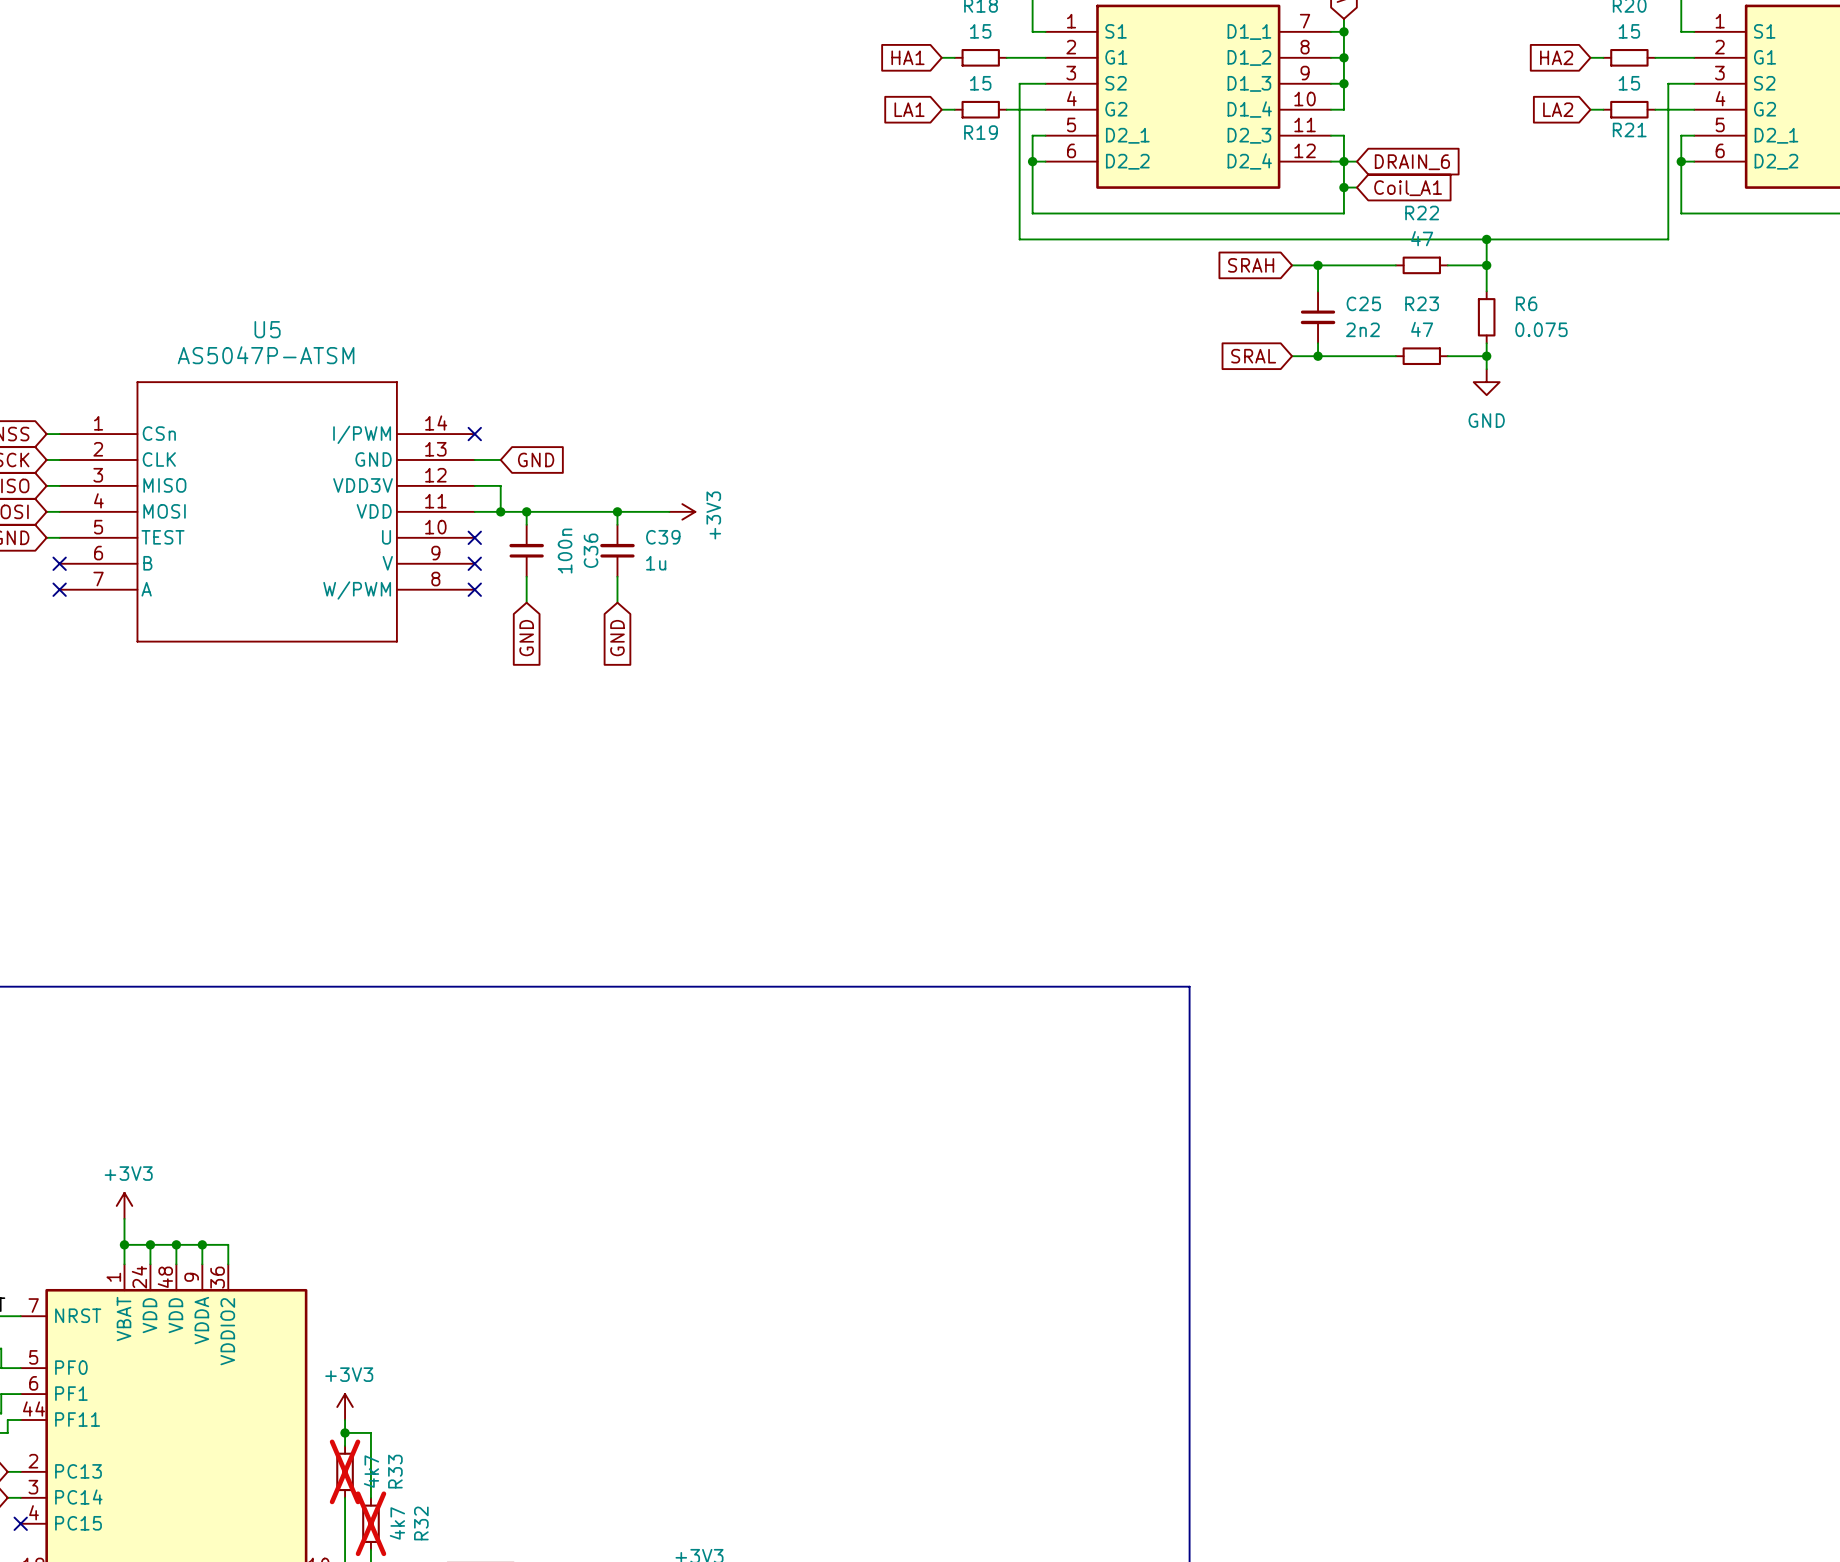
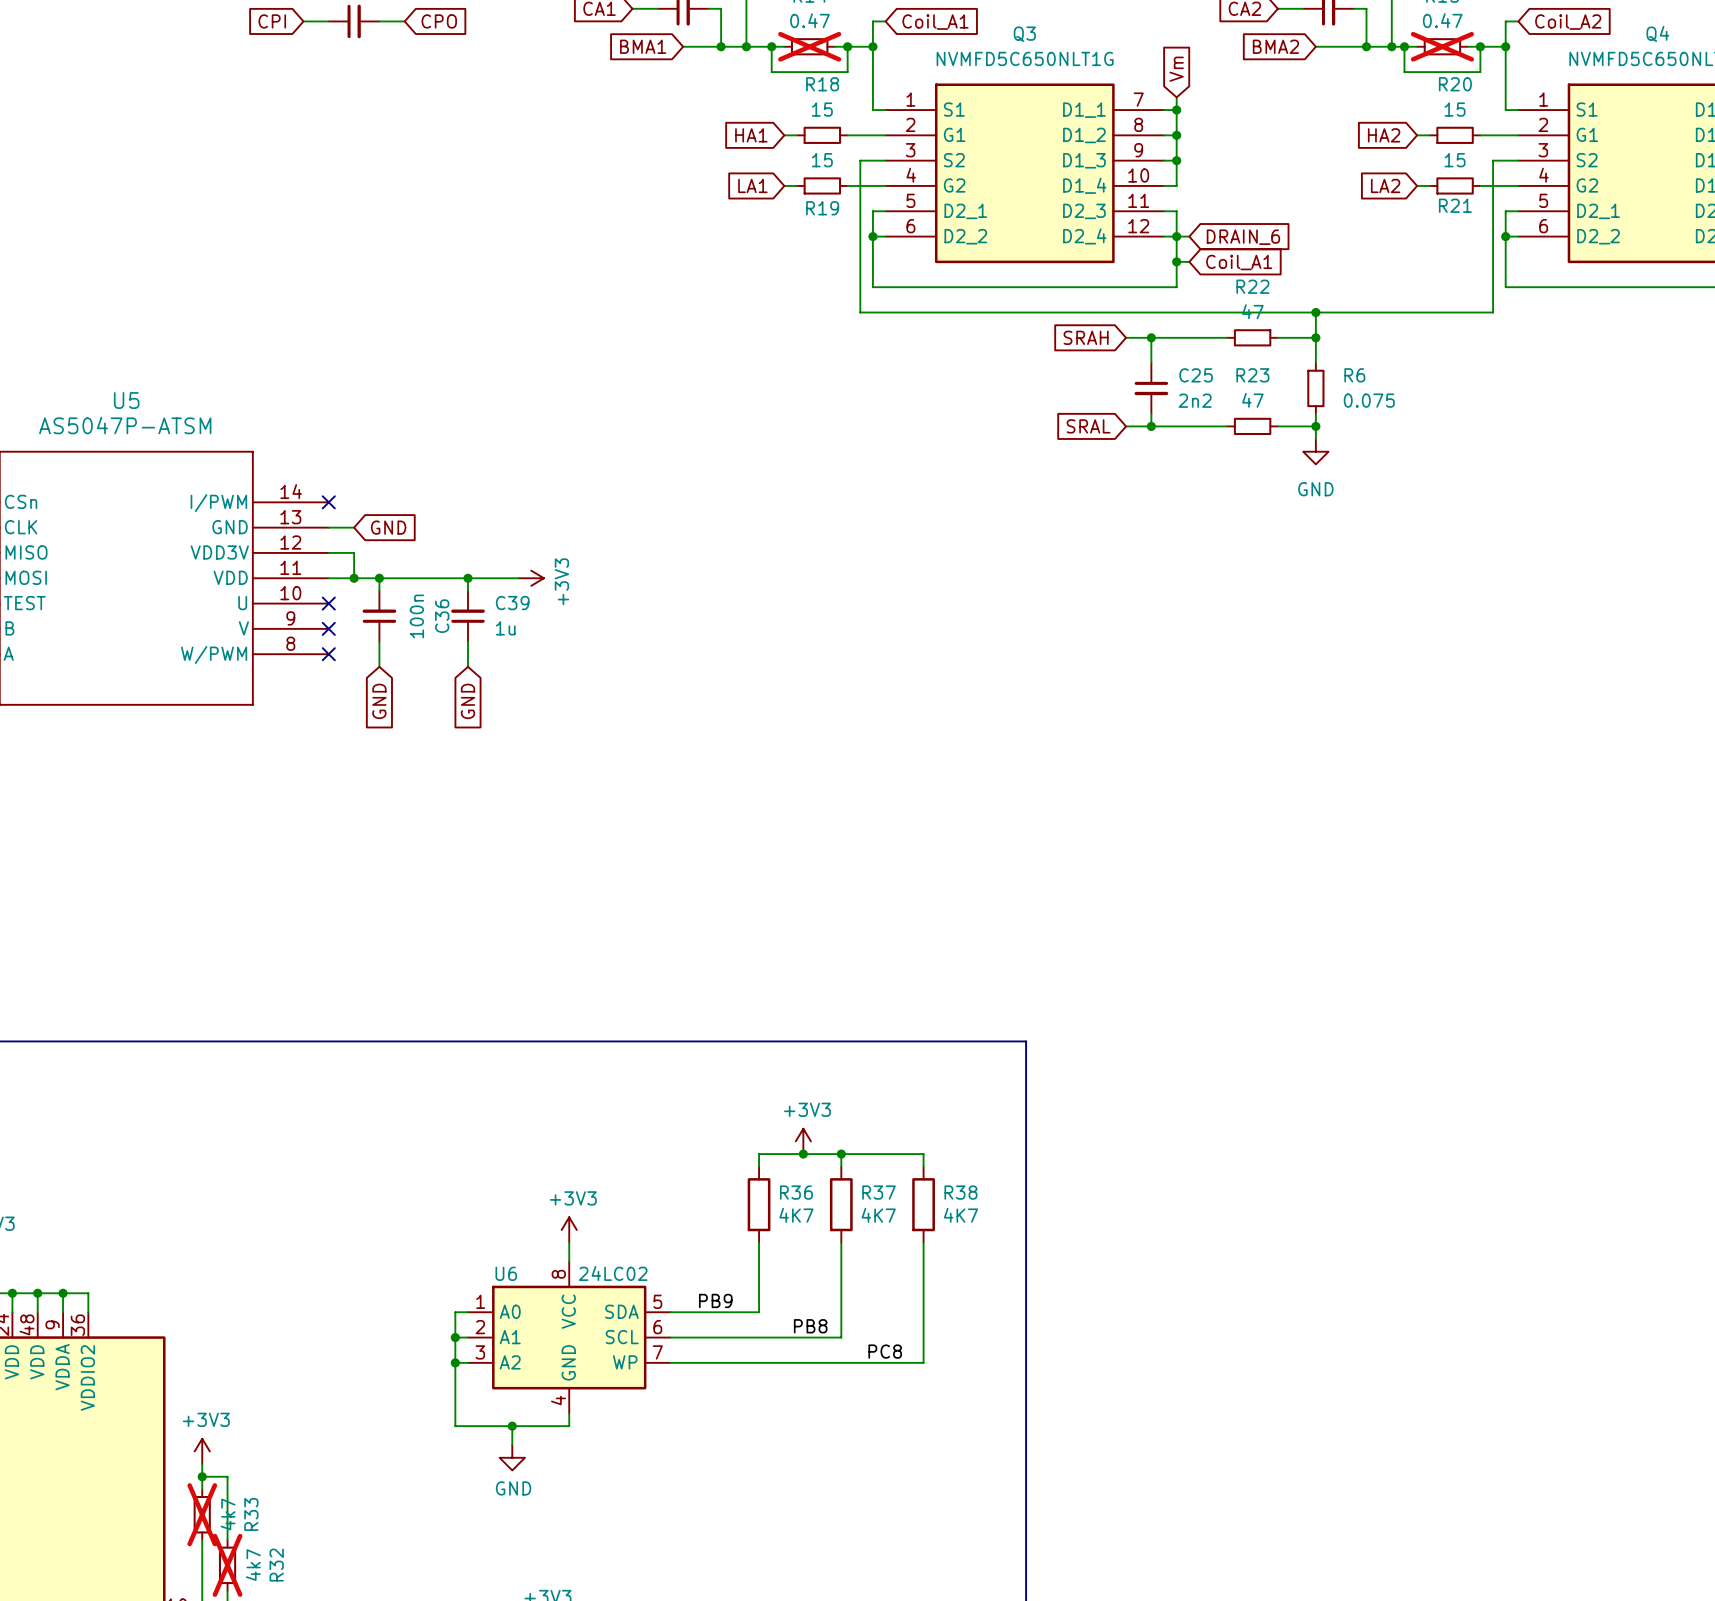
power symbol: none -> +3V3 (803, 1141)
junction: none -> (803, 1154)
wire: none -> (841, 1154) (841, 1166)
junction: none -> (841, 1154)
wire: none -> (759, 1166) (759, 1154) (923, 1154) (923, 1166)
R36: none -> 4K7 (759, 1204)
R37: none -> 4K7 (841, 1204)
R38: none -> 4K7 (923, 1204)
power symbol: none -> +3V3 (569, 1229)
wire: none -> (569, 1242) (569, 1261)
wire: none -> (759, 1242) (759, 1312) (670, 1312)
wire: none -> (841, 1242) (841, 1337) (670, 1337)
wire: none -> (923, 1242) (923, 1362) (670, 1362)
label: none -> PB9 (715, 1300)
wire: none -> (467, 1312) (455, 1312) (455, 1426) (569, 1426) (569, 1413)
label: none -> PB8 (810, 1326)
wire: none -> (455, 1337) (467, 1337)
junction: none -> (455, 1337)
U6: none -> 24LC02 (569, 1337)
label: none -> PC8 (885, 1351)
wire: none -> (455, 1362) (467, 1362)
junction: none -> (455, 1362)
wire: none -> (512, 1426) (512, 1445)
junction: none -> (512, 1426)
power symbol: none -> GND (512, 1457)

